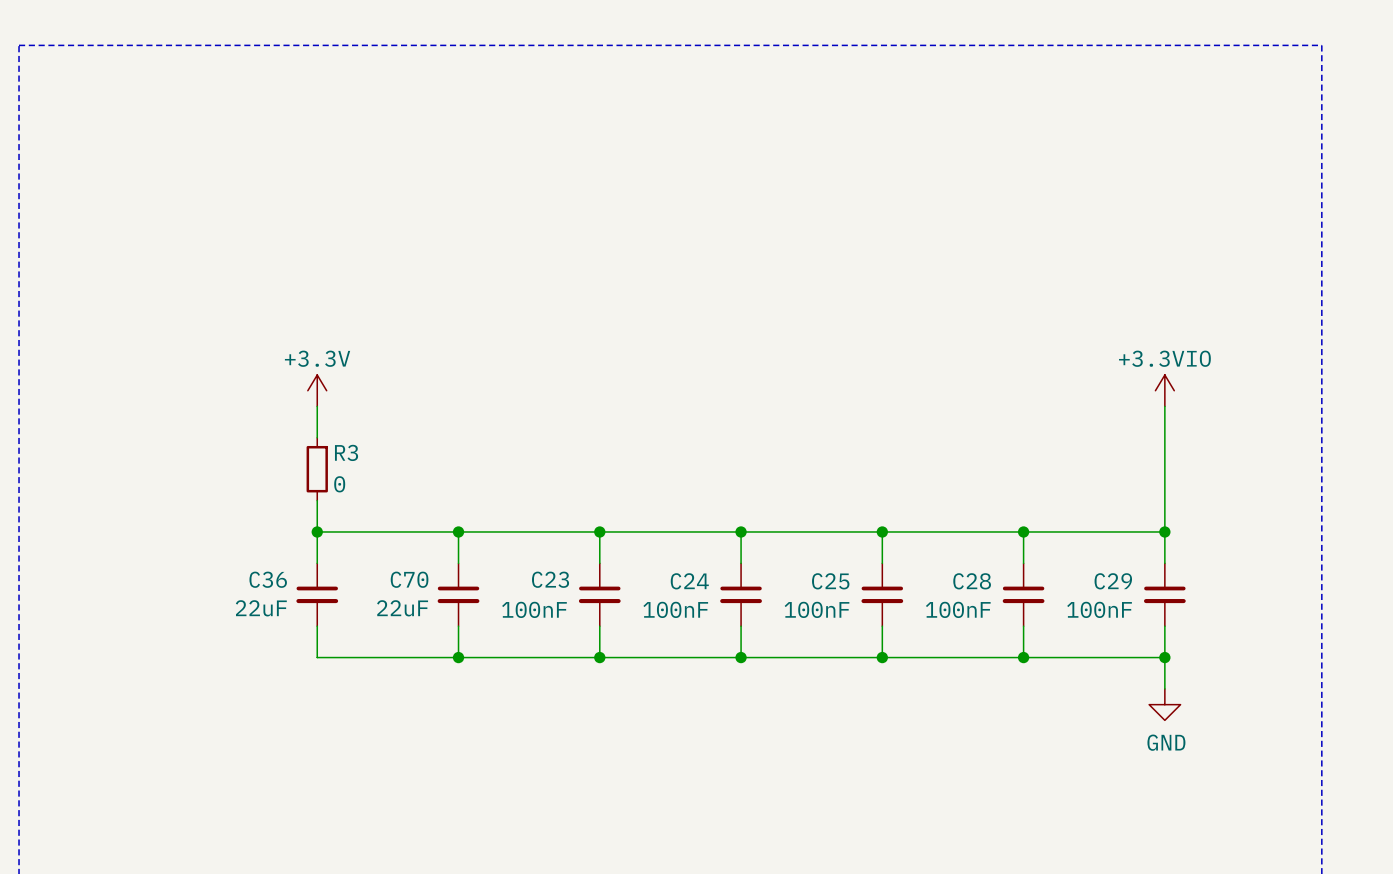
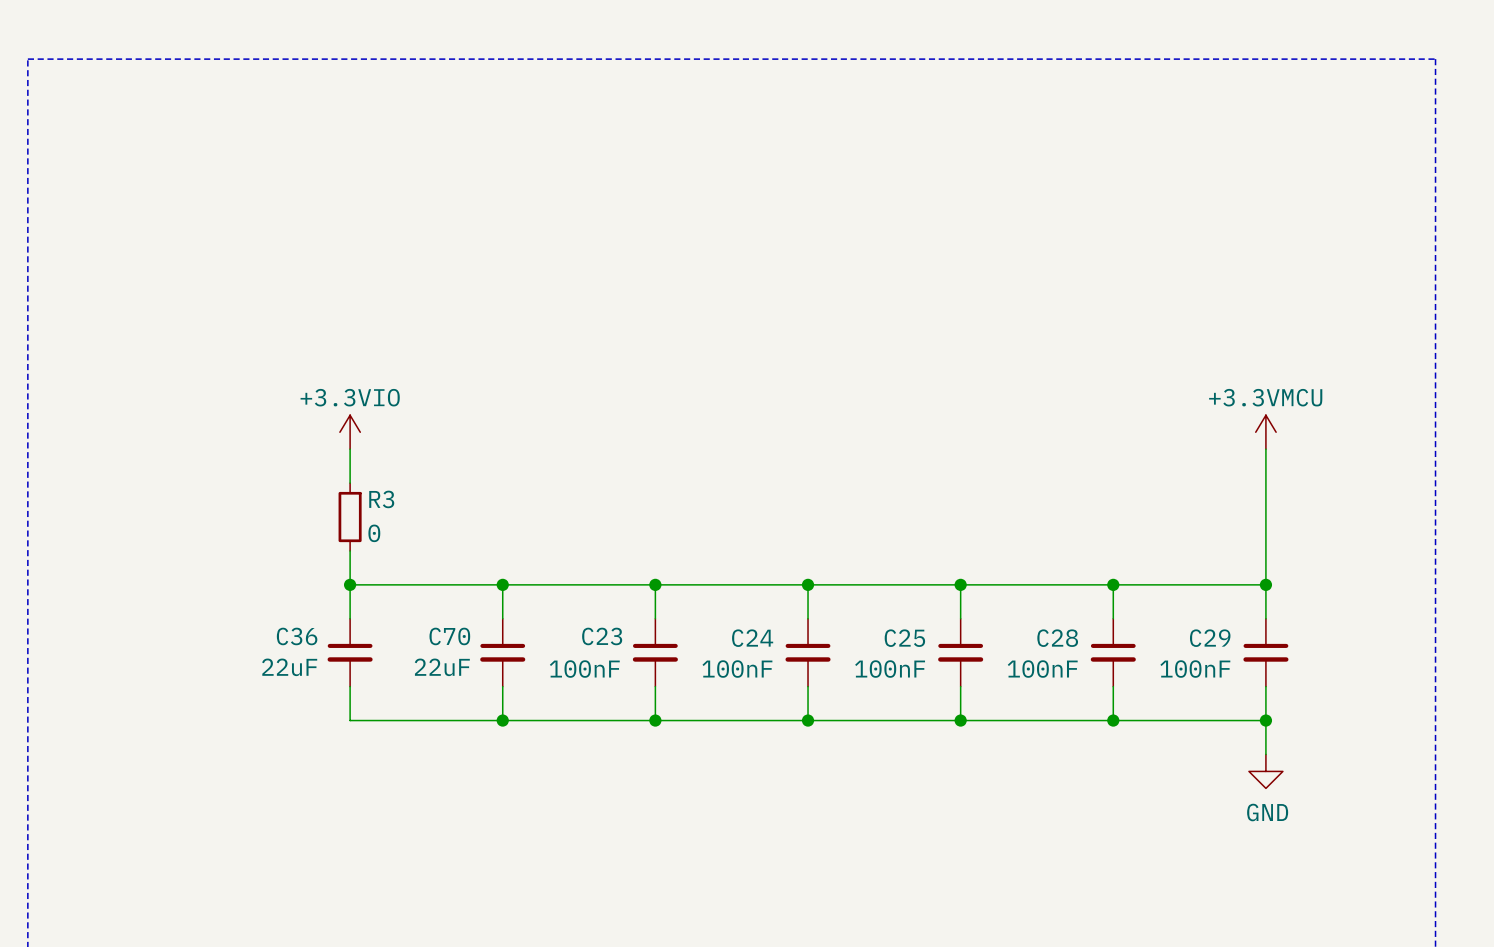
power symbol: +3.3V (317, 390) -> +3.3VIO (350, 432)
power symbol: +3.3VIO (1164, 390) -> +3.3VMCU (1265, 432)

